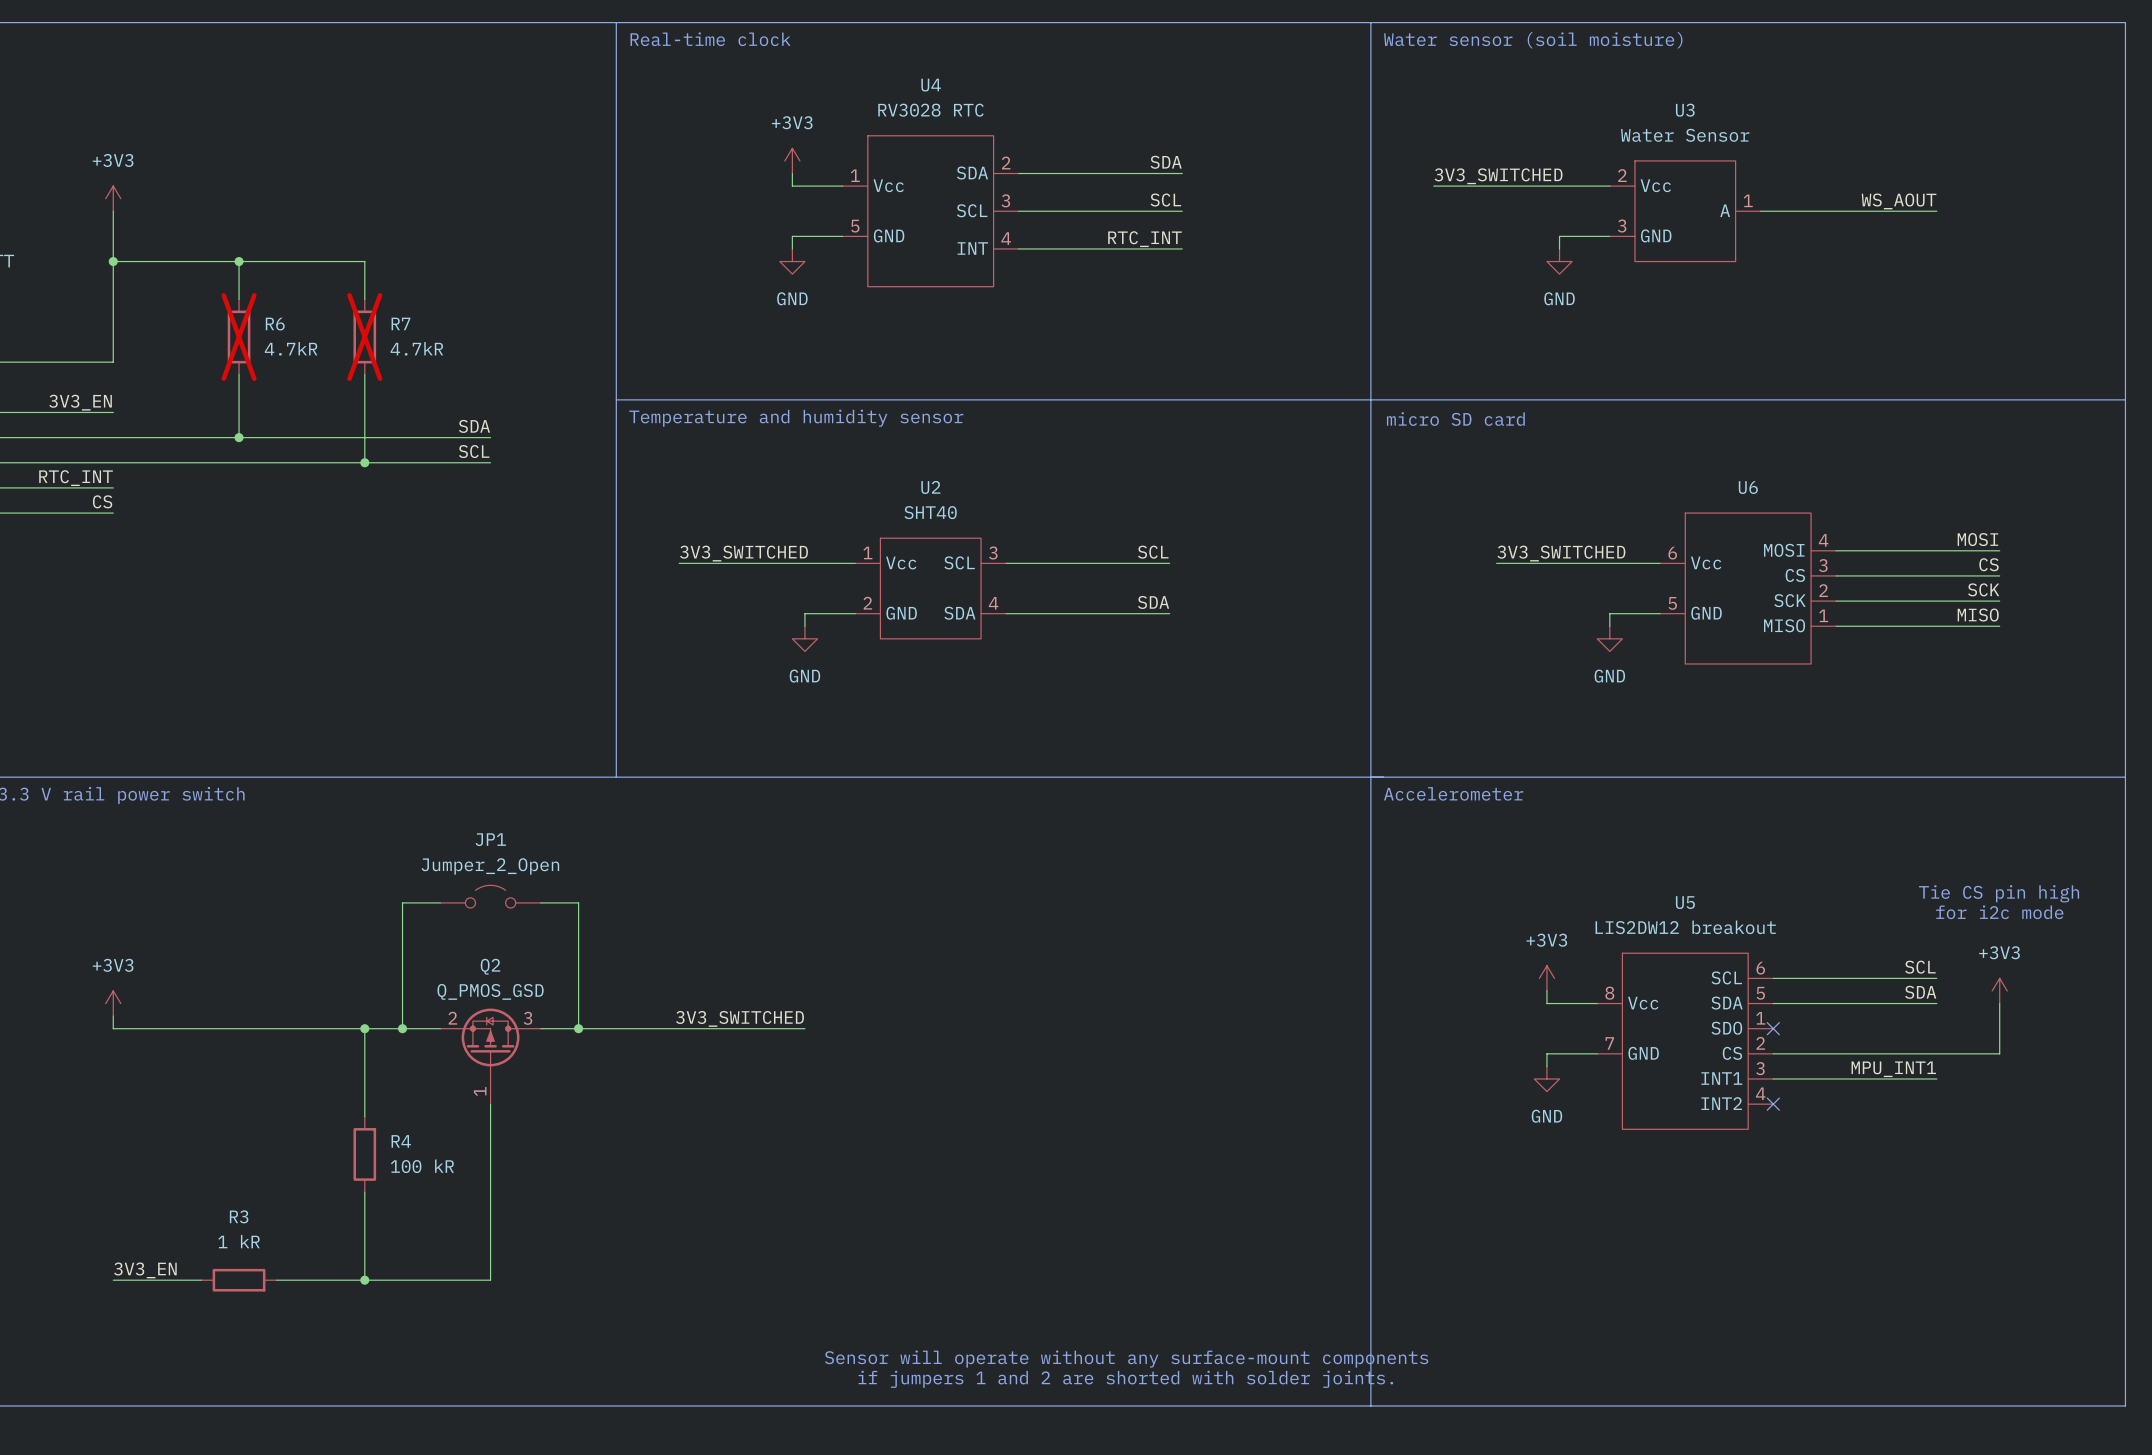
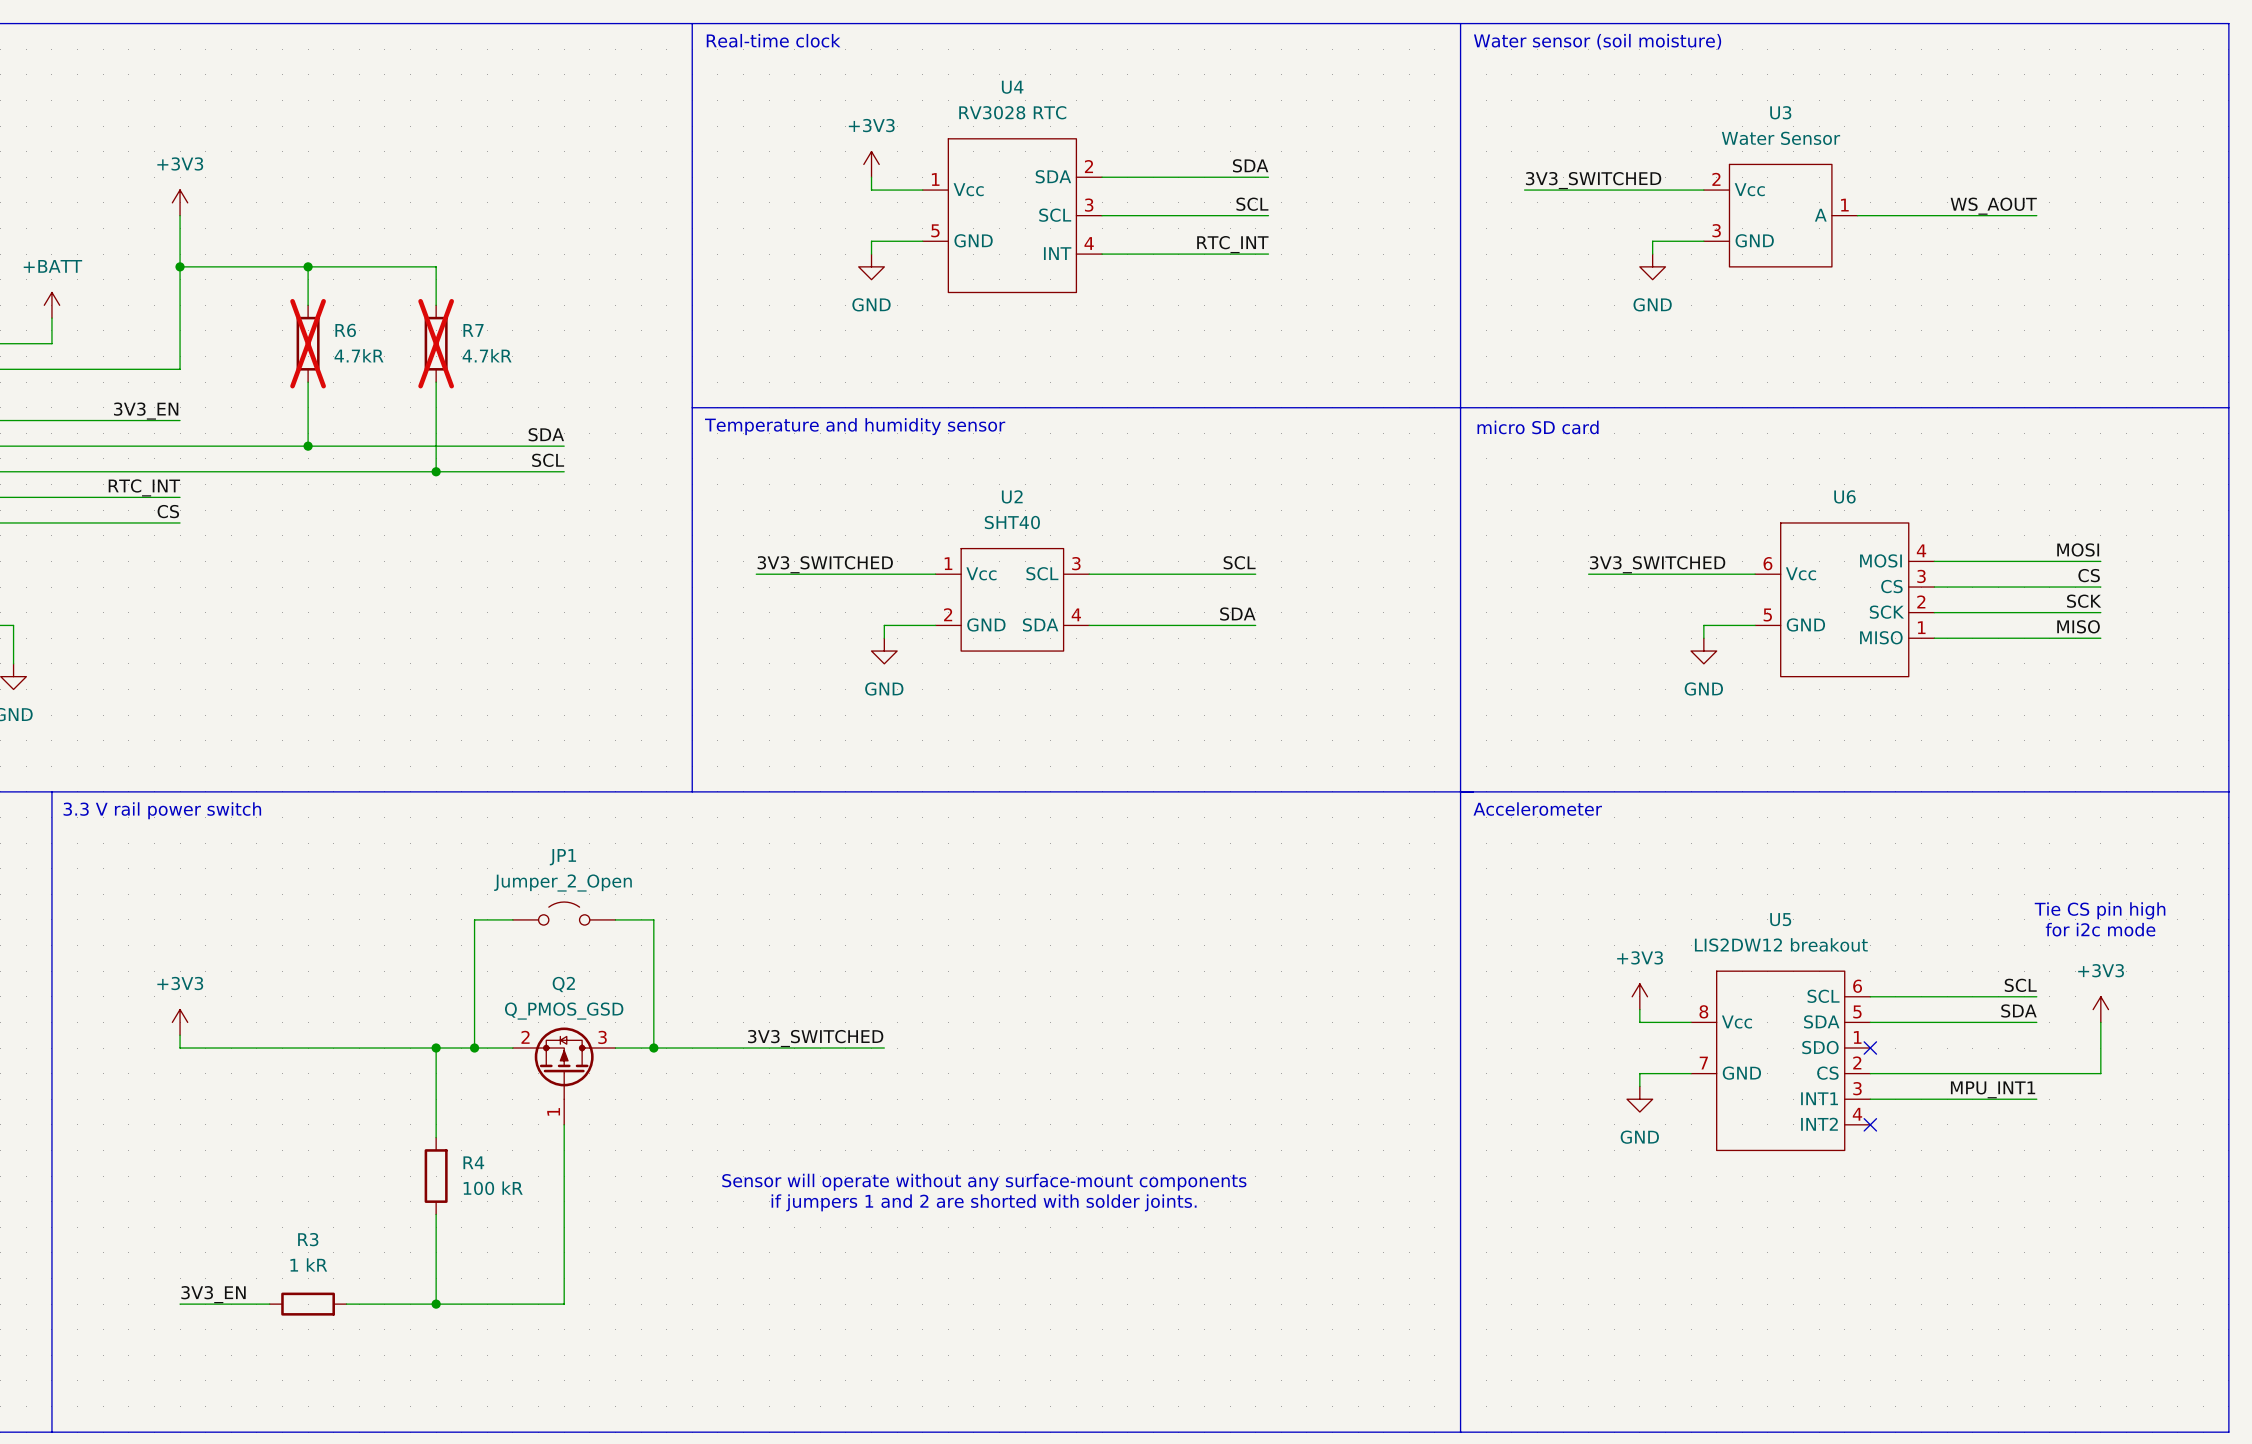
text: none -> Sensor will operate without any surface-mount components (984, 1182)
text: none -> if jumpers 1 and 2 are shorted with solder joints. (984, 1202)
text: Sensor will operate without any surface-mount components (1126, 1359) -> none
text: if jumpers 1 and 2 are shorted with solder joints. (1125, 1379) -> none

